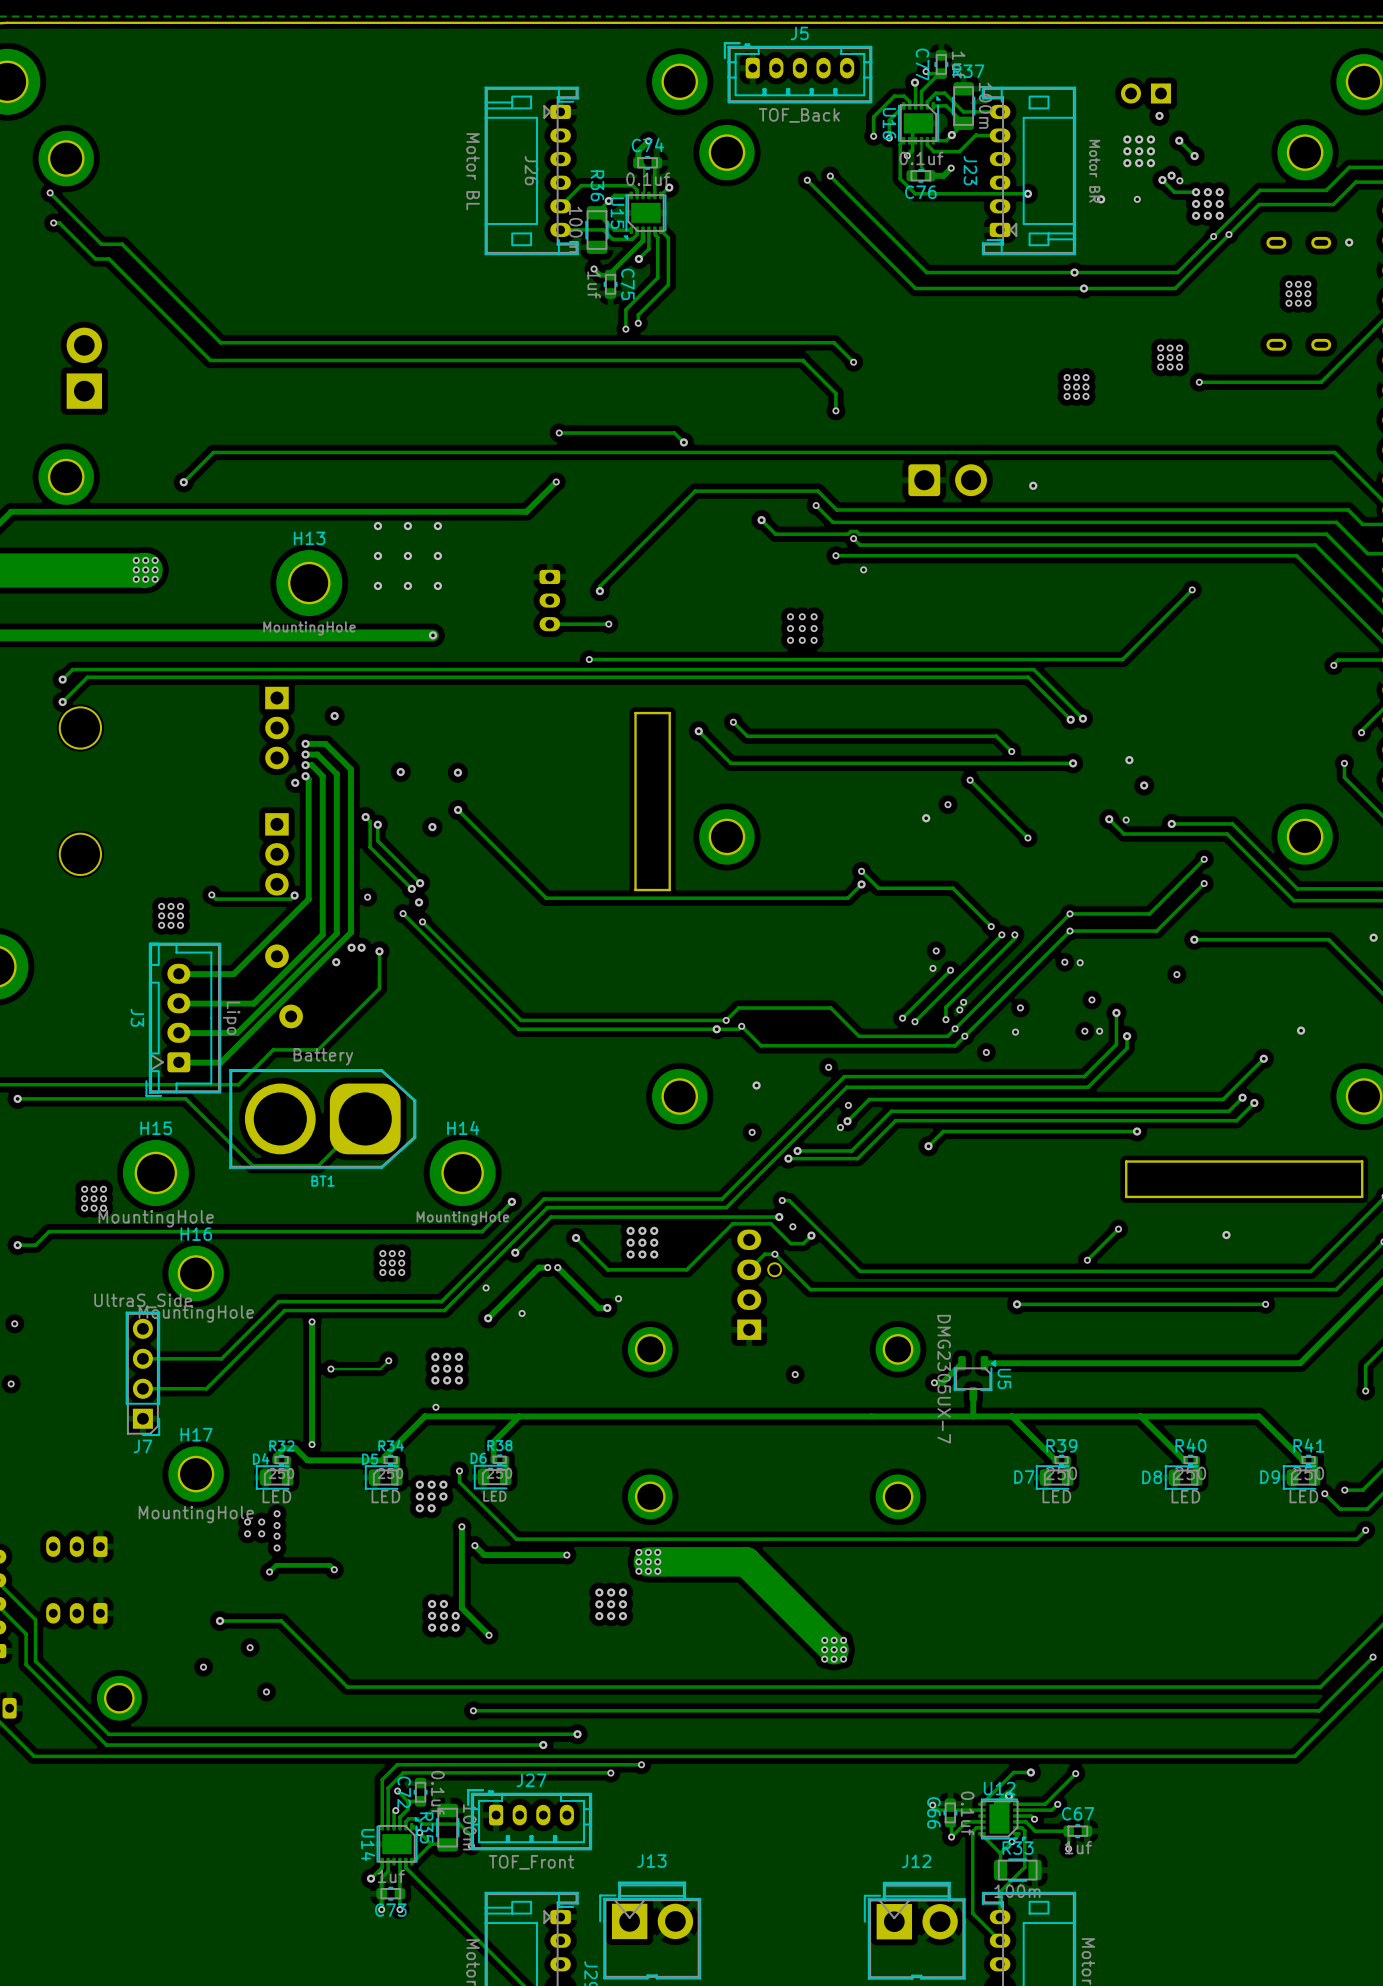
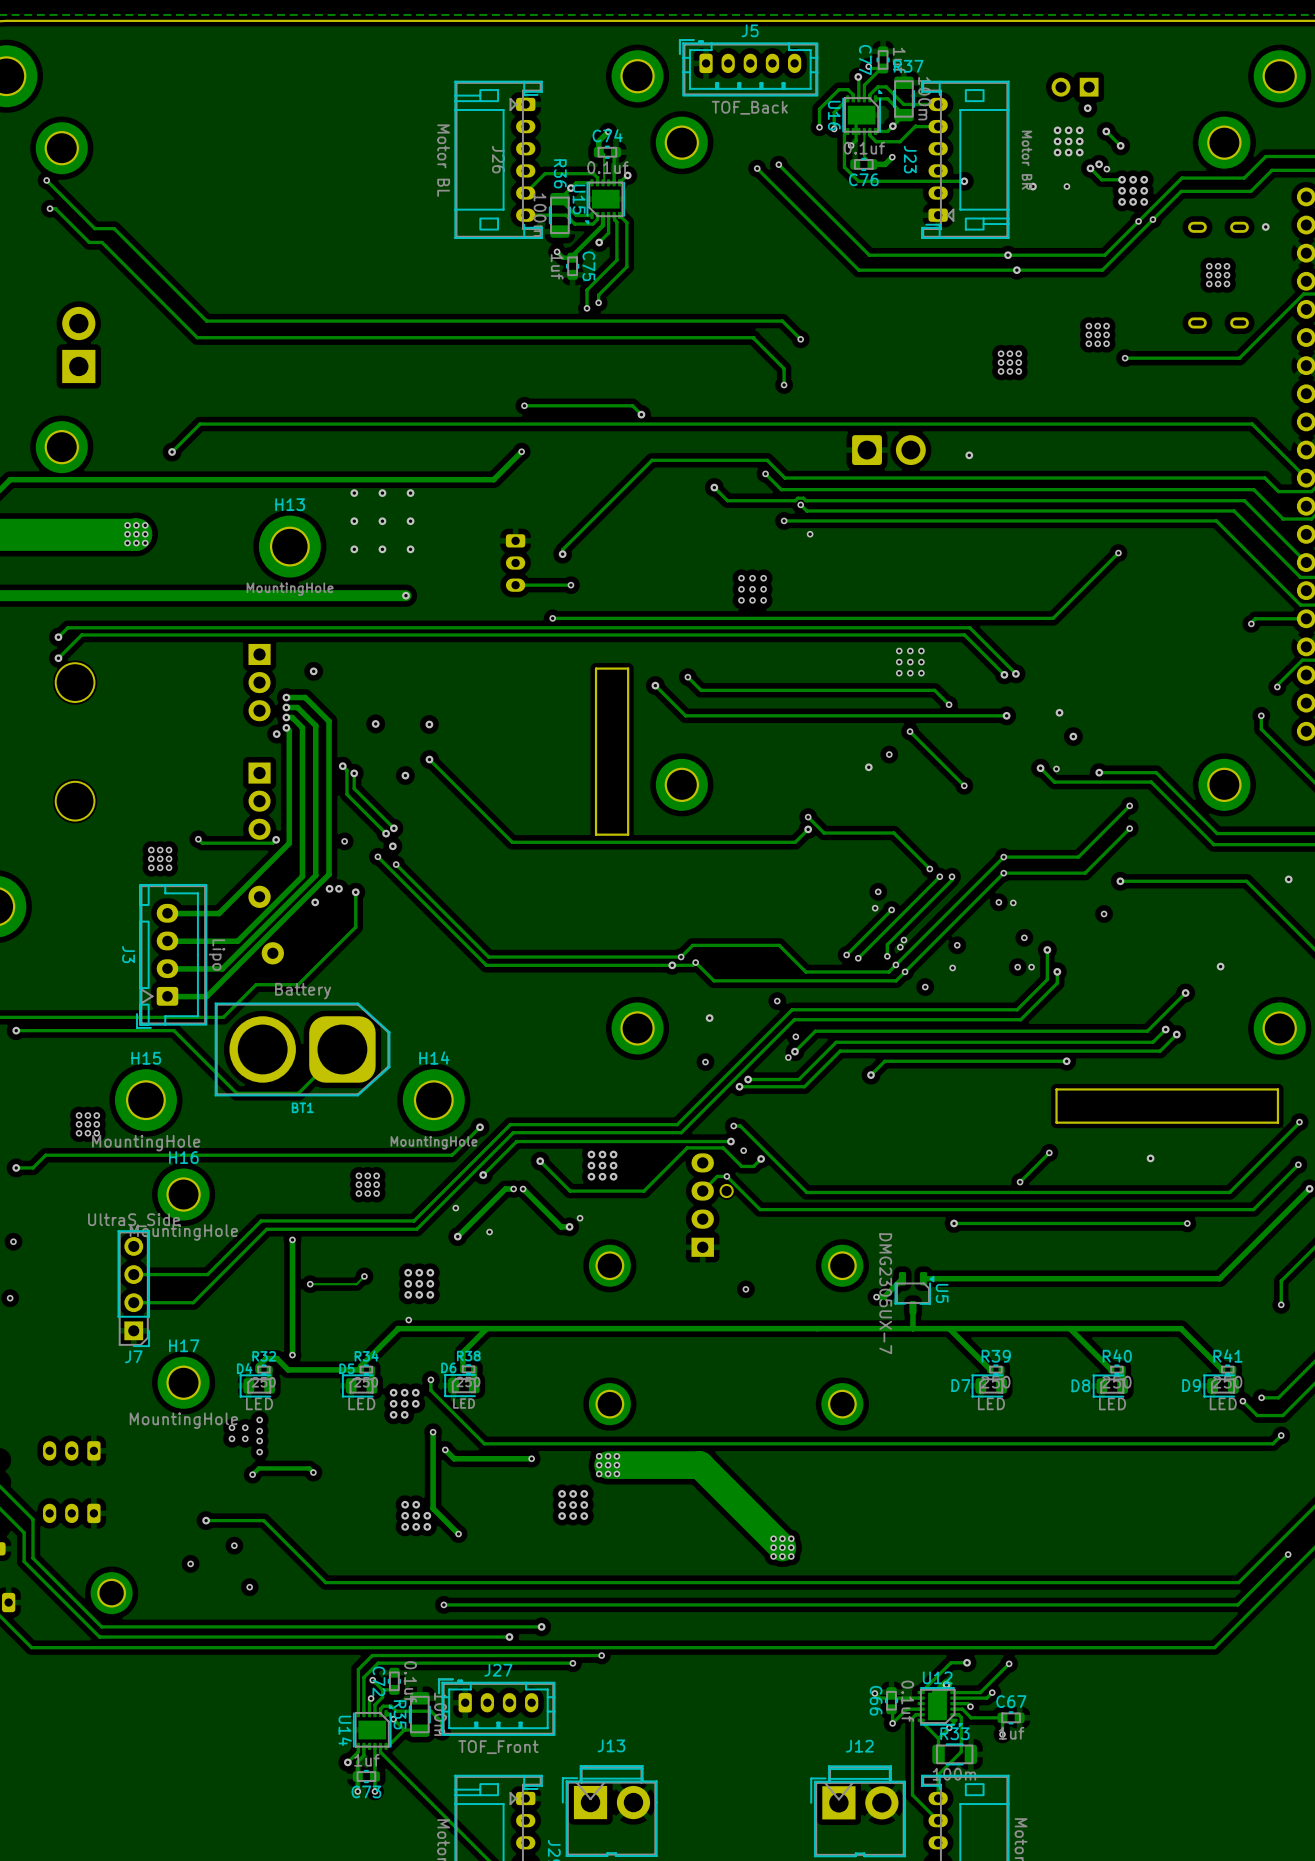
via: none -> (899, 651)
via: none -> (910, 651)
via: none -> (921, 651)
via: none -> (899, 662)
via: none -> (910, 662)
via: none -> (921, 662)
via: none -> (899, 673)
via: none -> (910, 673)
via: none -> (921, 673)

